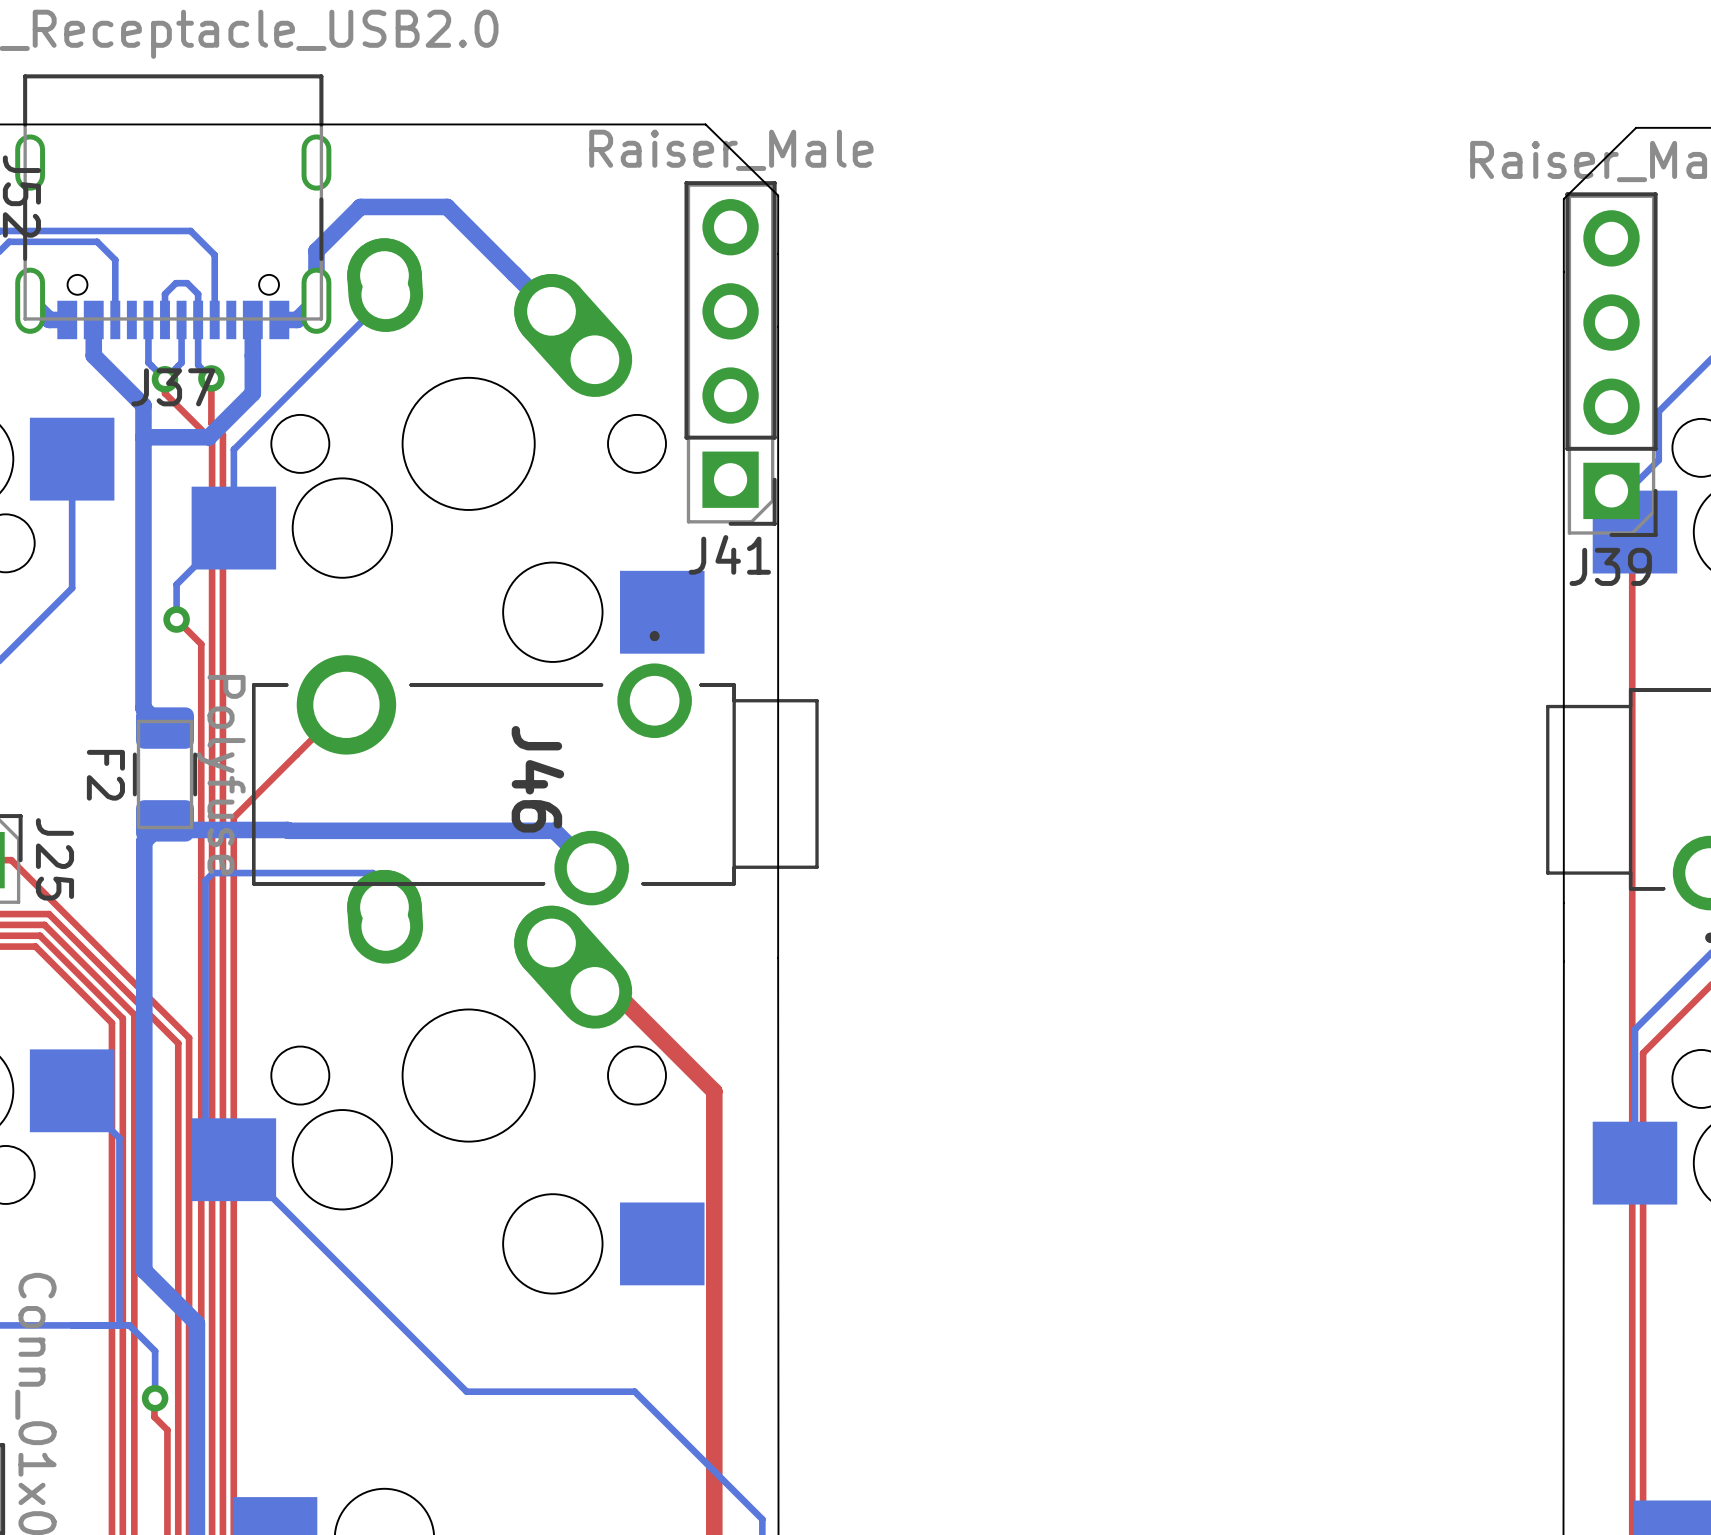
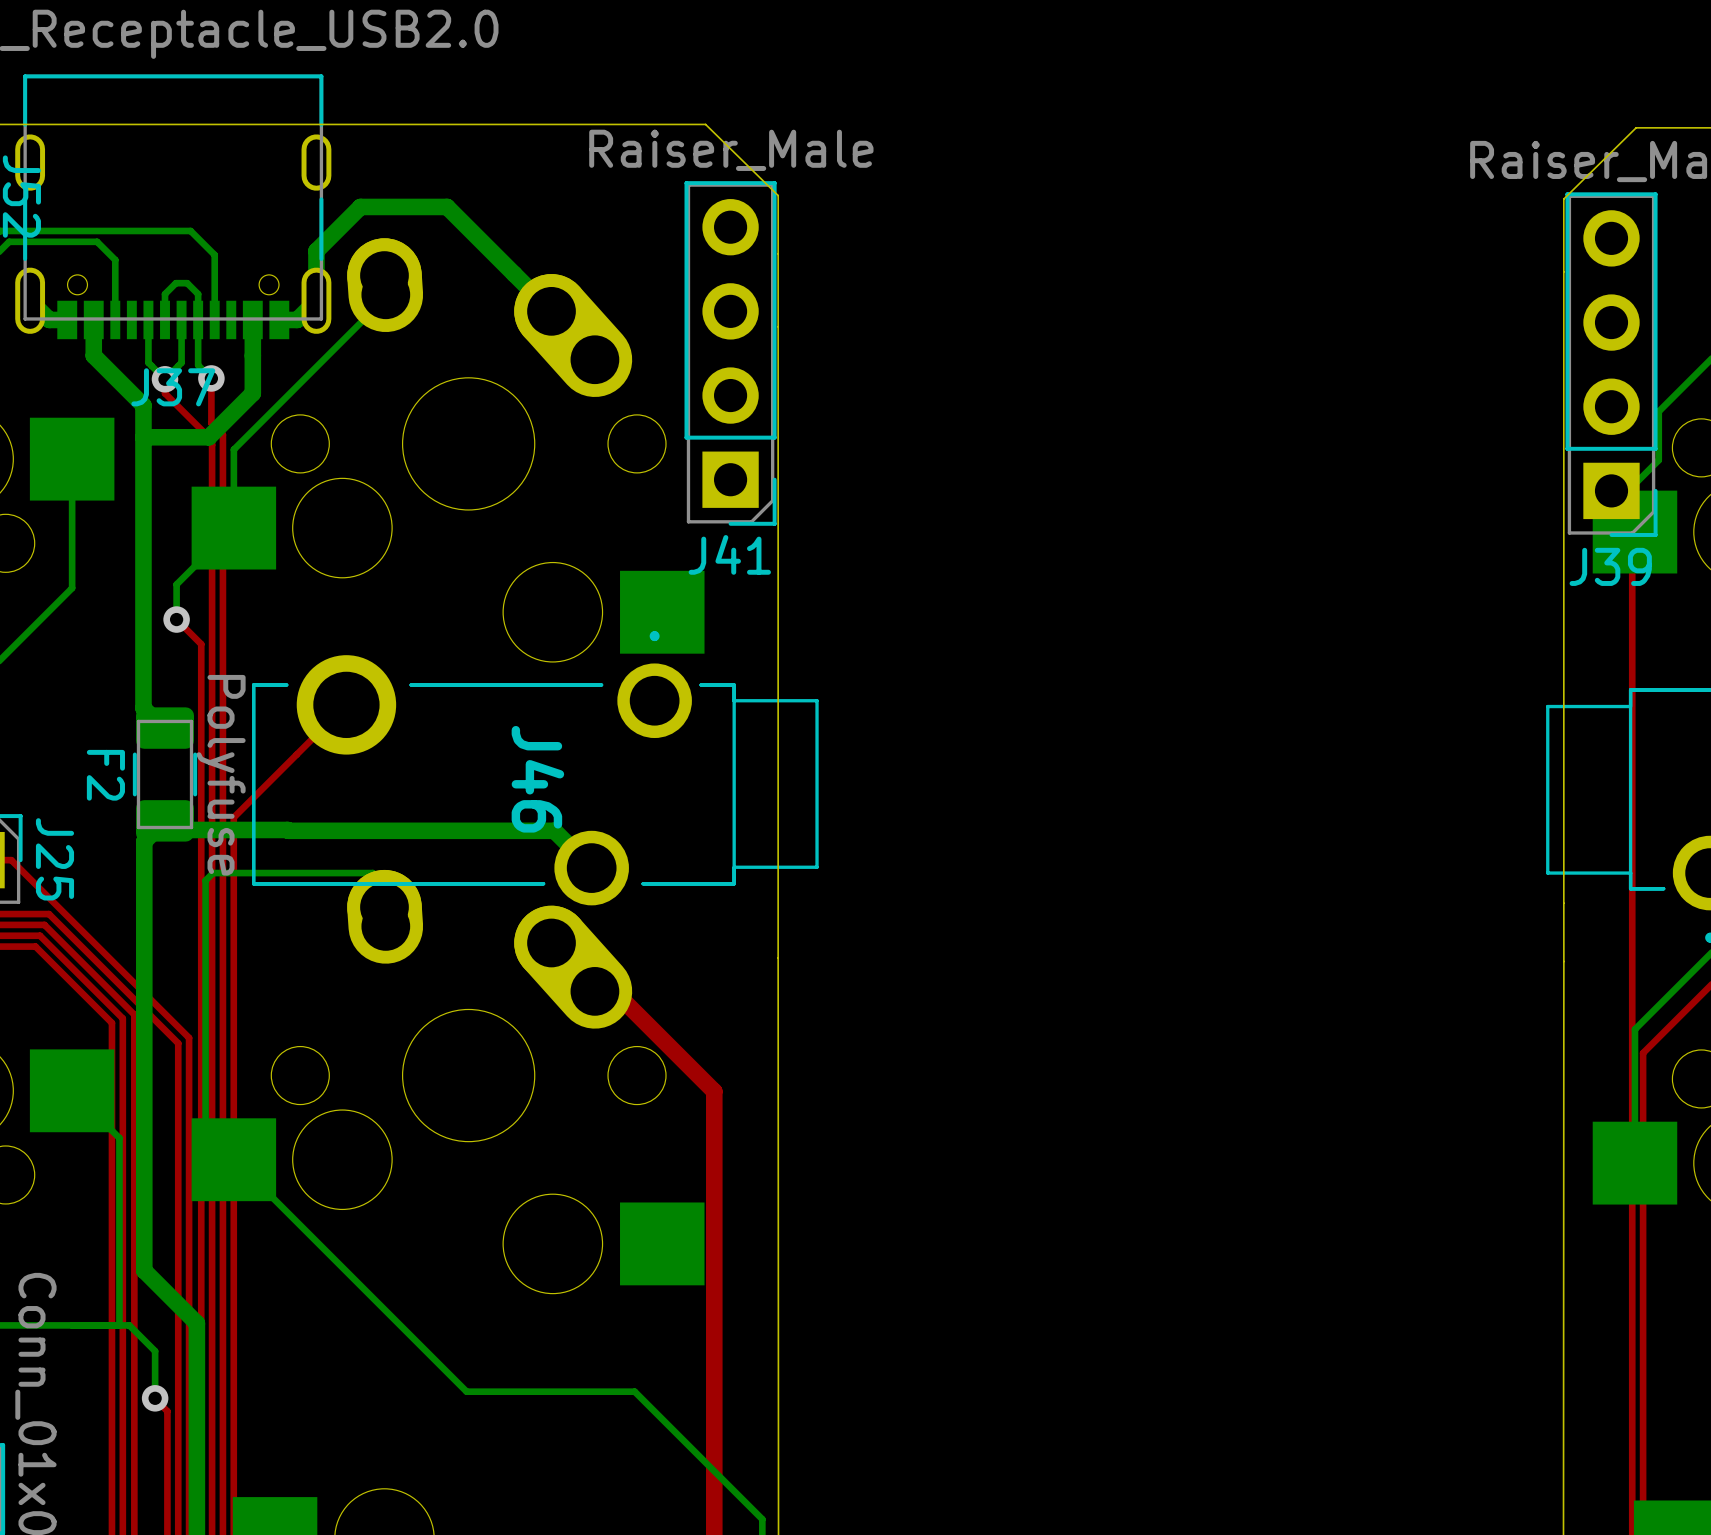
top track: (154, 1398) (154, 1417) (167, 1430) -> (154, 1398) (167, 1411) (167, 1430)

